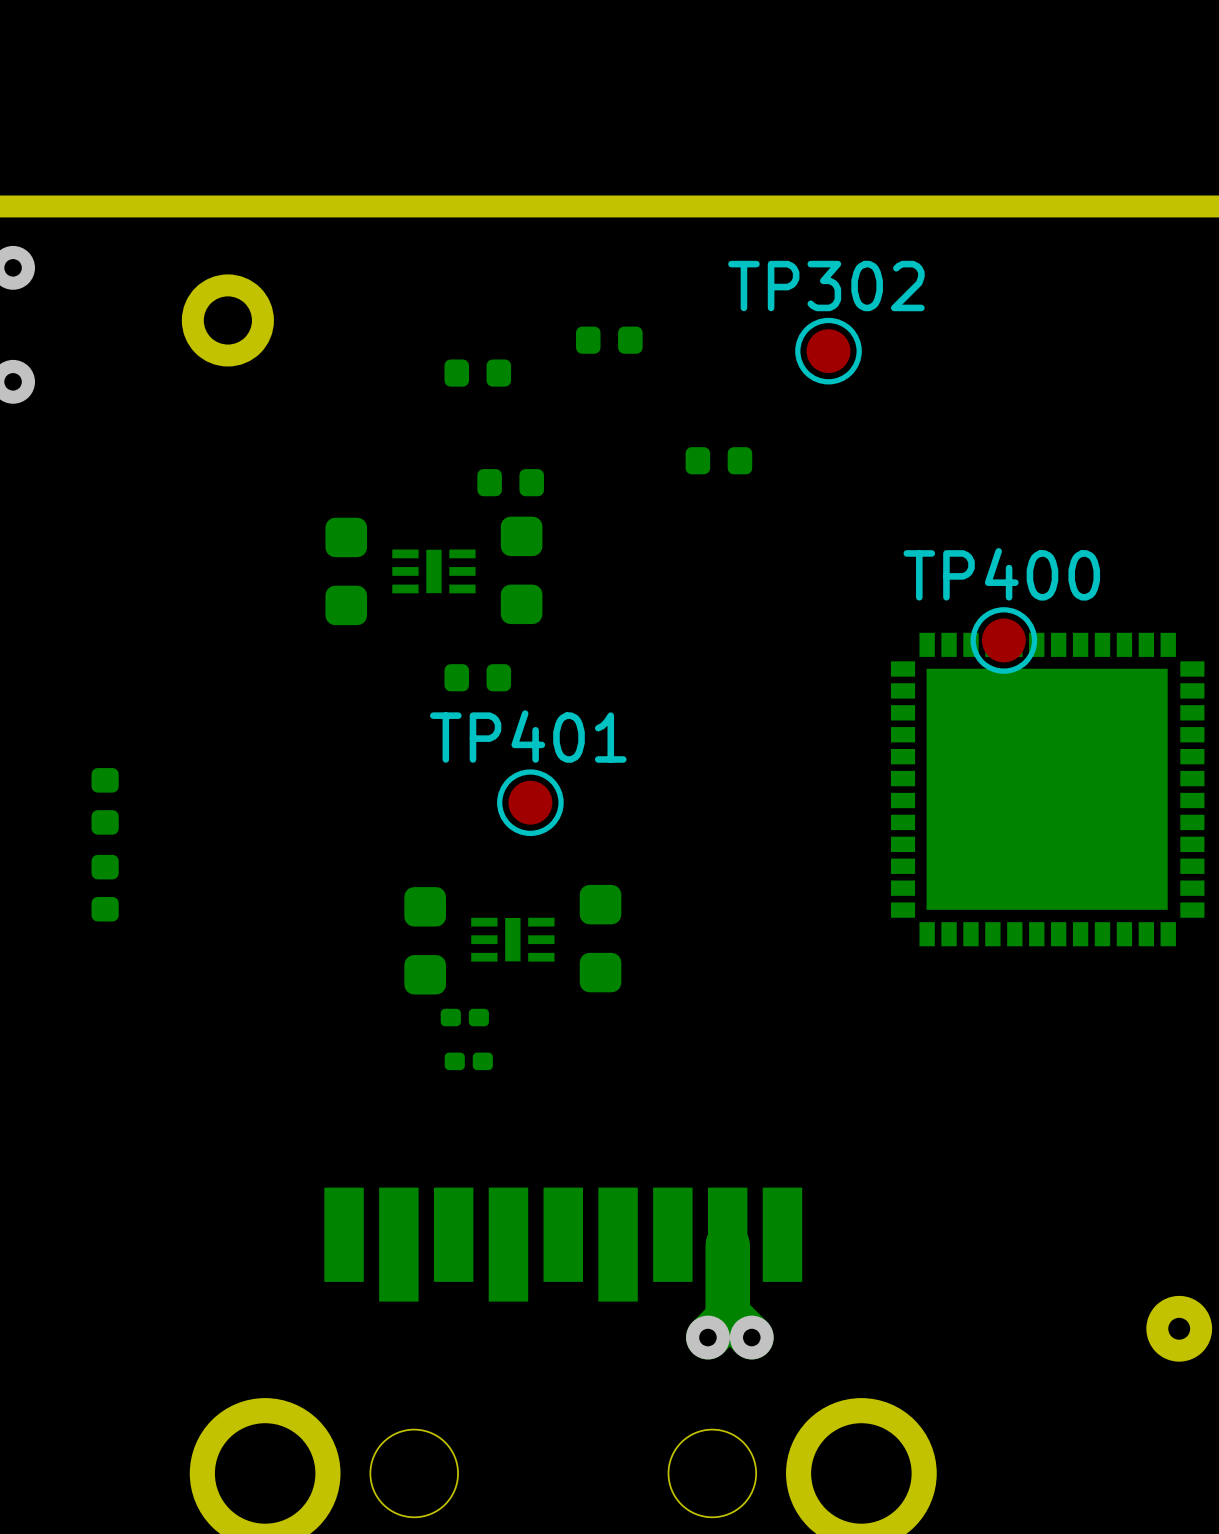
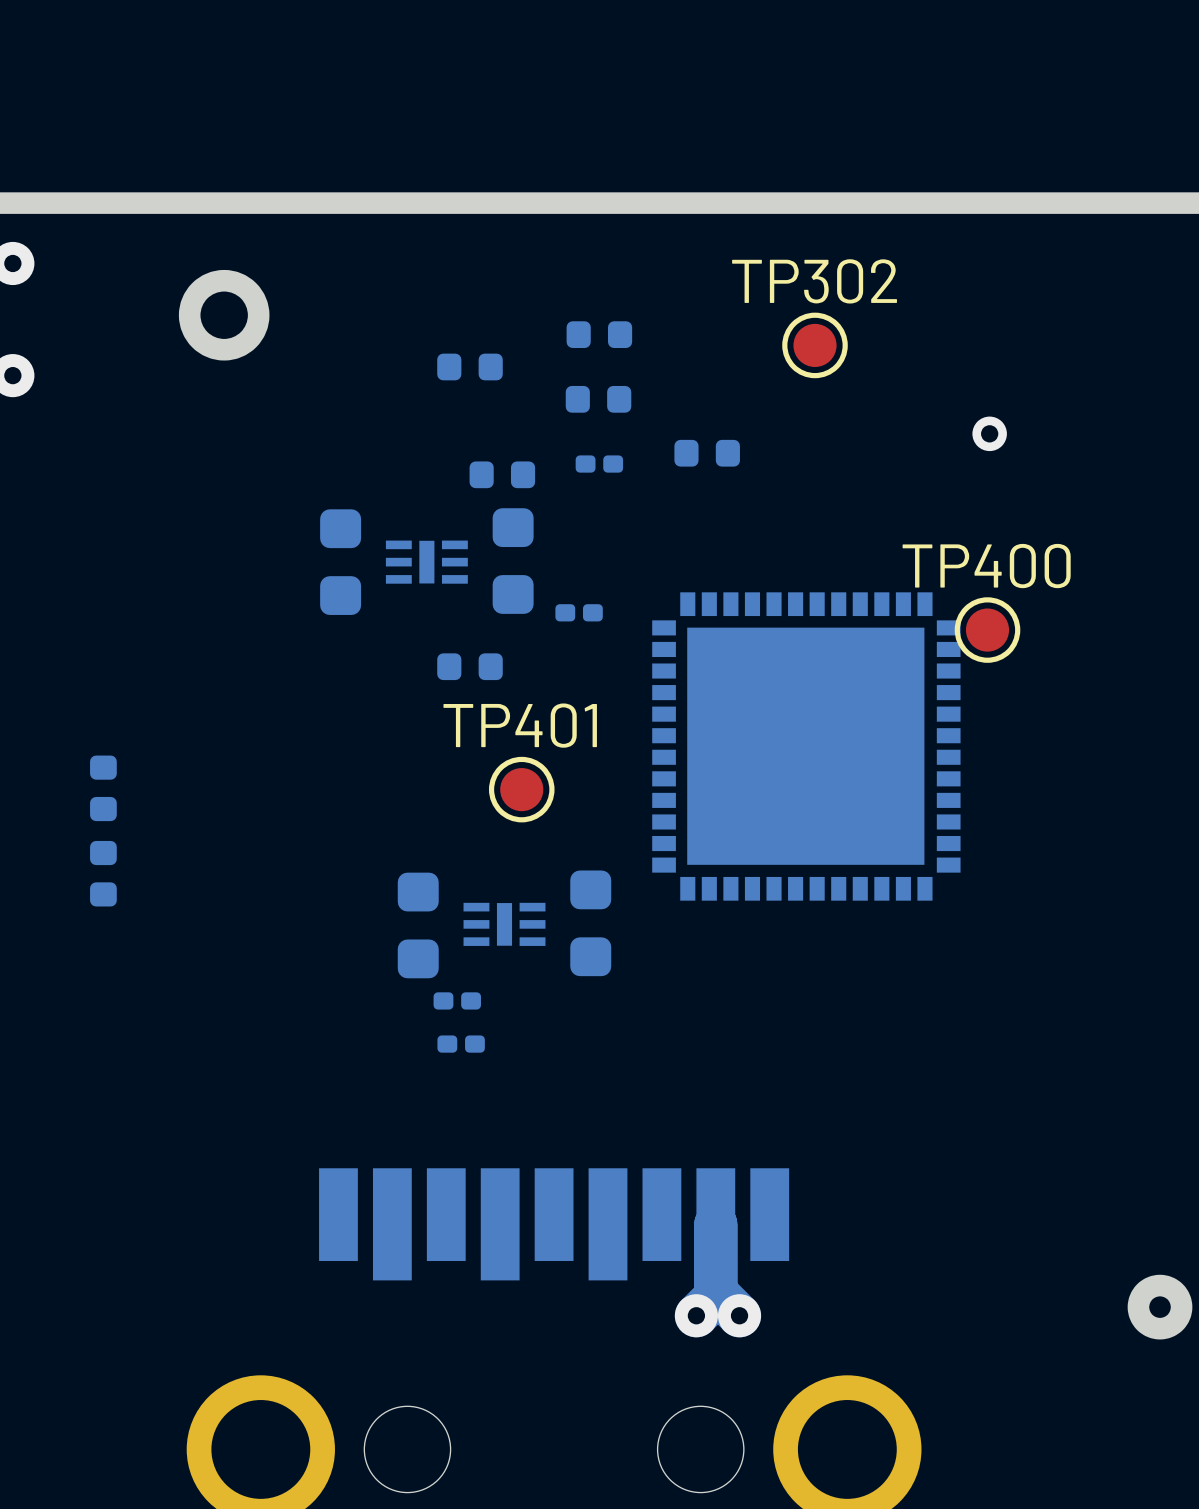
part: none -> (598, 399)
via: none -> (989, 433)
part: none -> (599, 464)
part: none -> (579, 612)
part position: (1047, 789) -> (806, 746)

